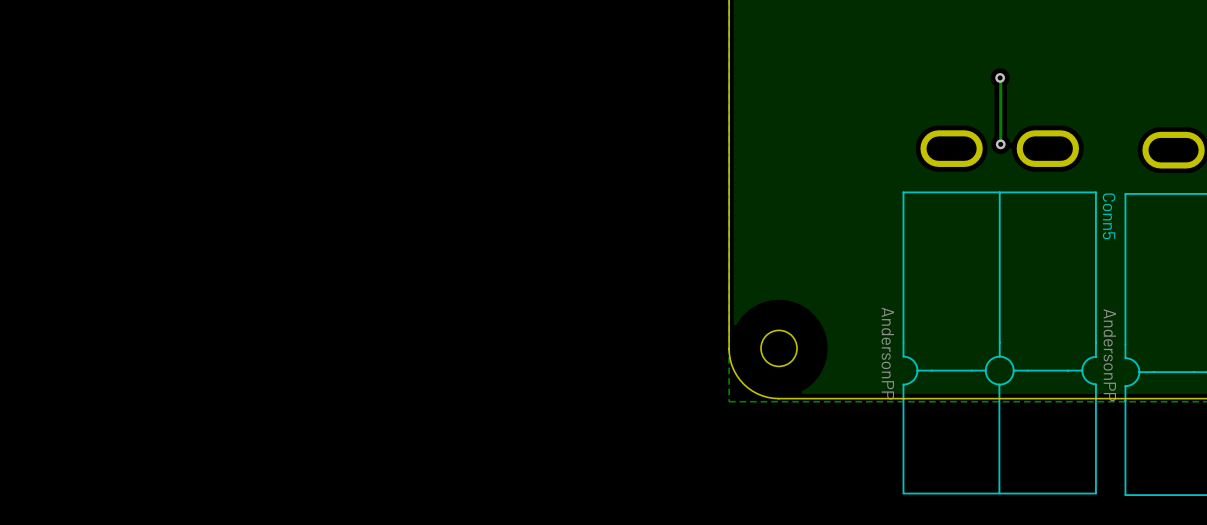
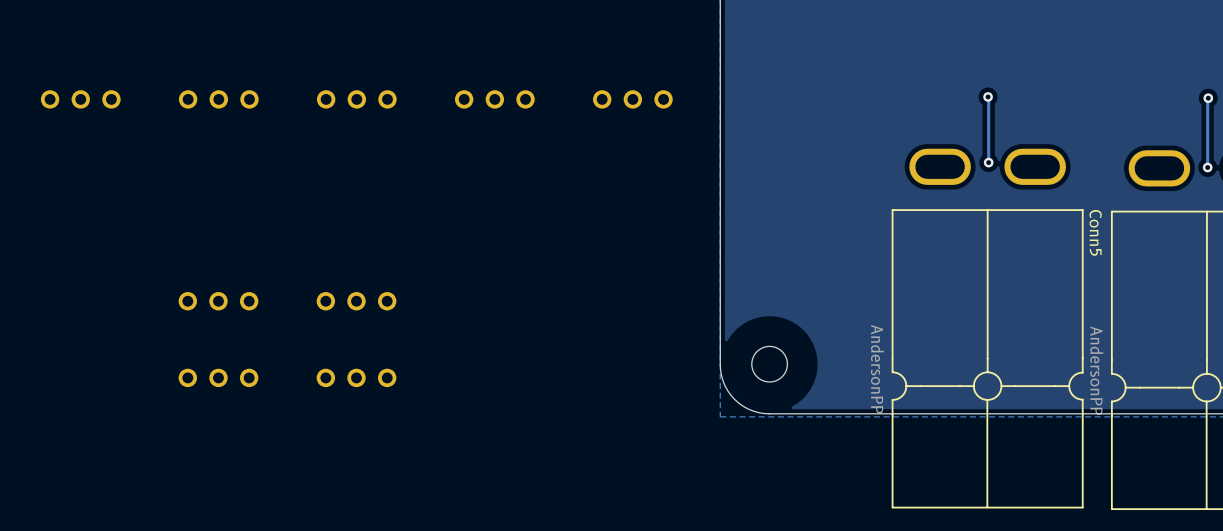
part: none -> (80, 99)
part: none -> (218, 99)
part: none -> (356, 99)
part: none -> (494, 99)
part: none -> (632, 99)
part: none -> (218, 301)
part: none -> (356, 301)
part: none -> (218, 377)
part: none -> (356, 377)

